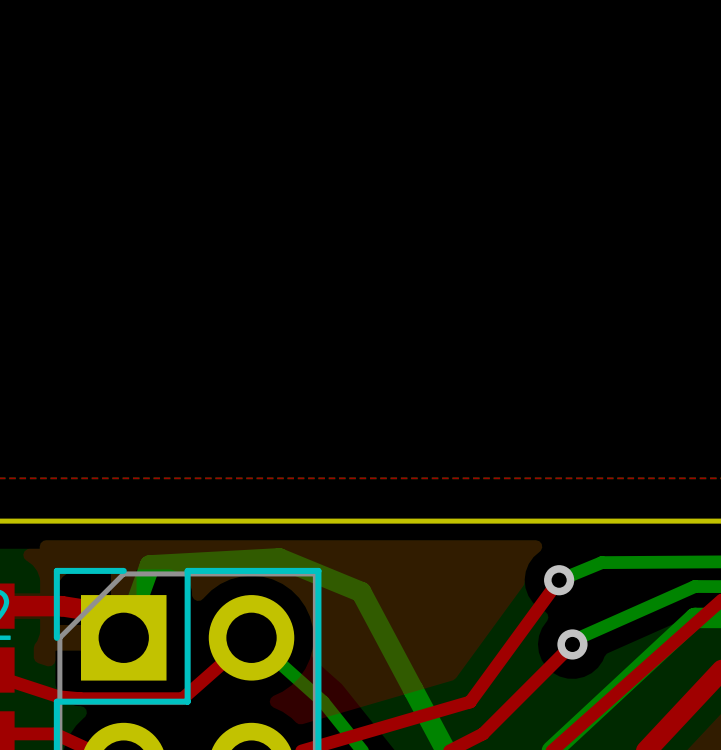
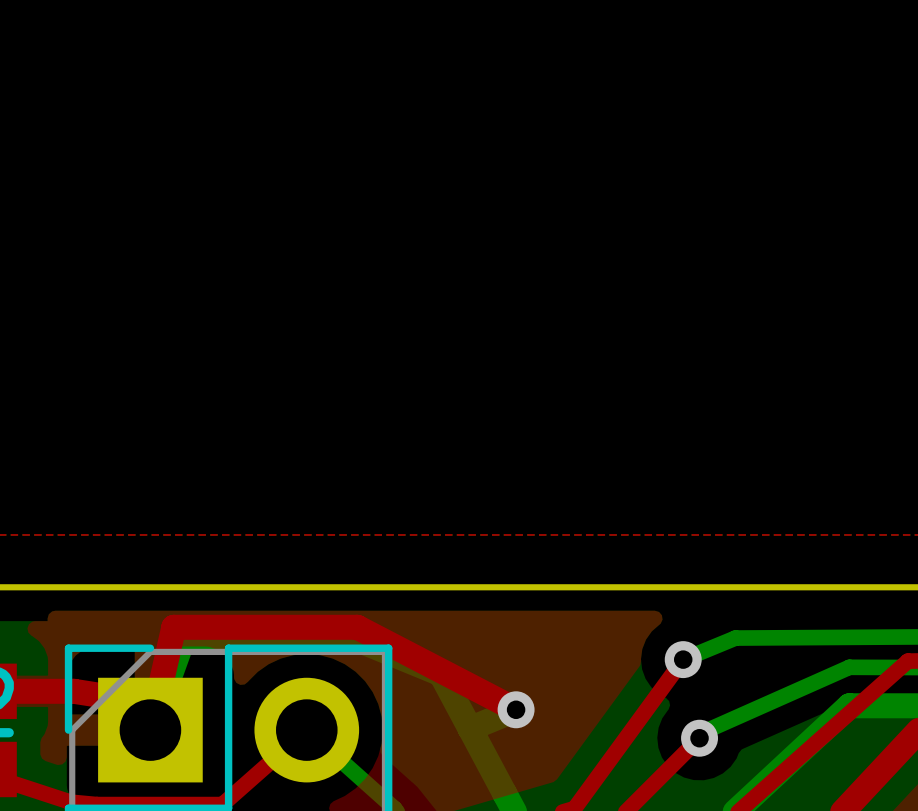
top track: none -> (516, 709) (357, 627) (173, 627) (150, 730)
via: none -> (516, 709)

